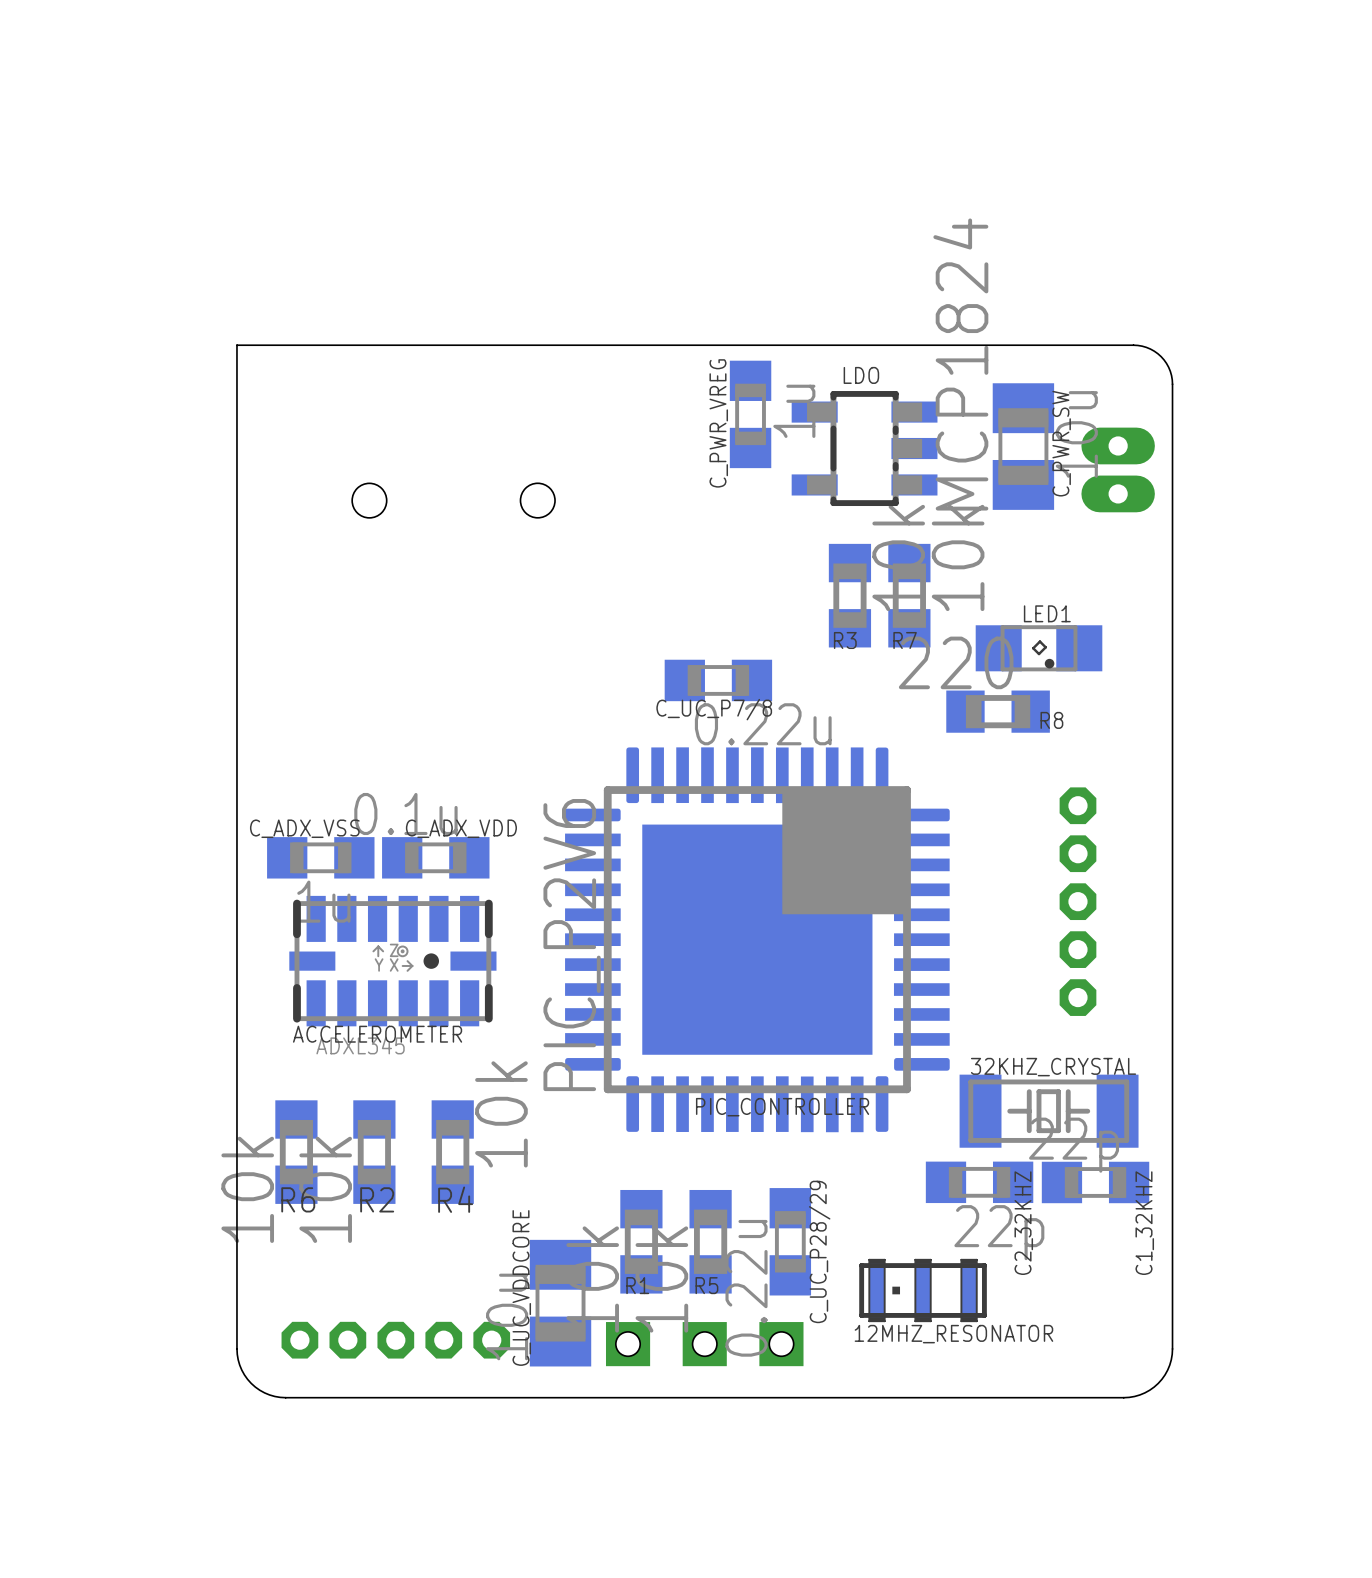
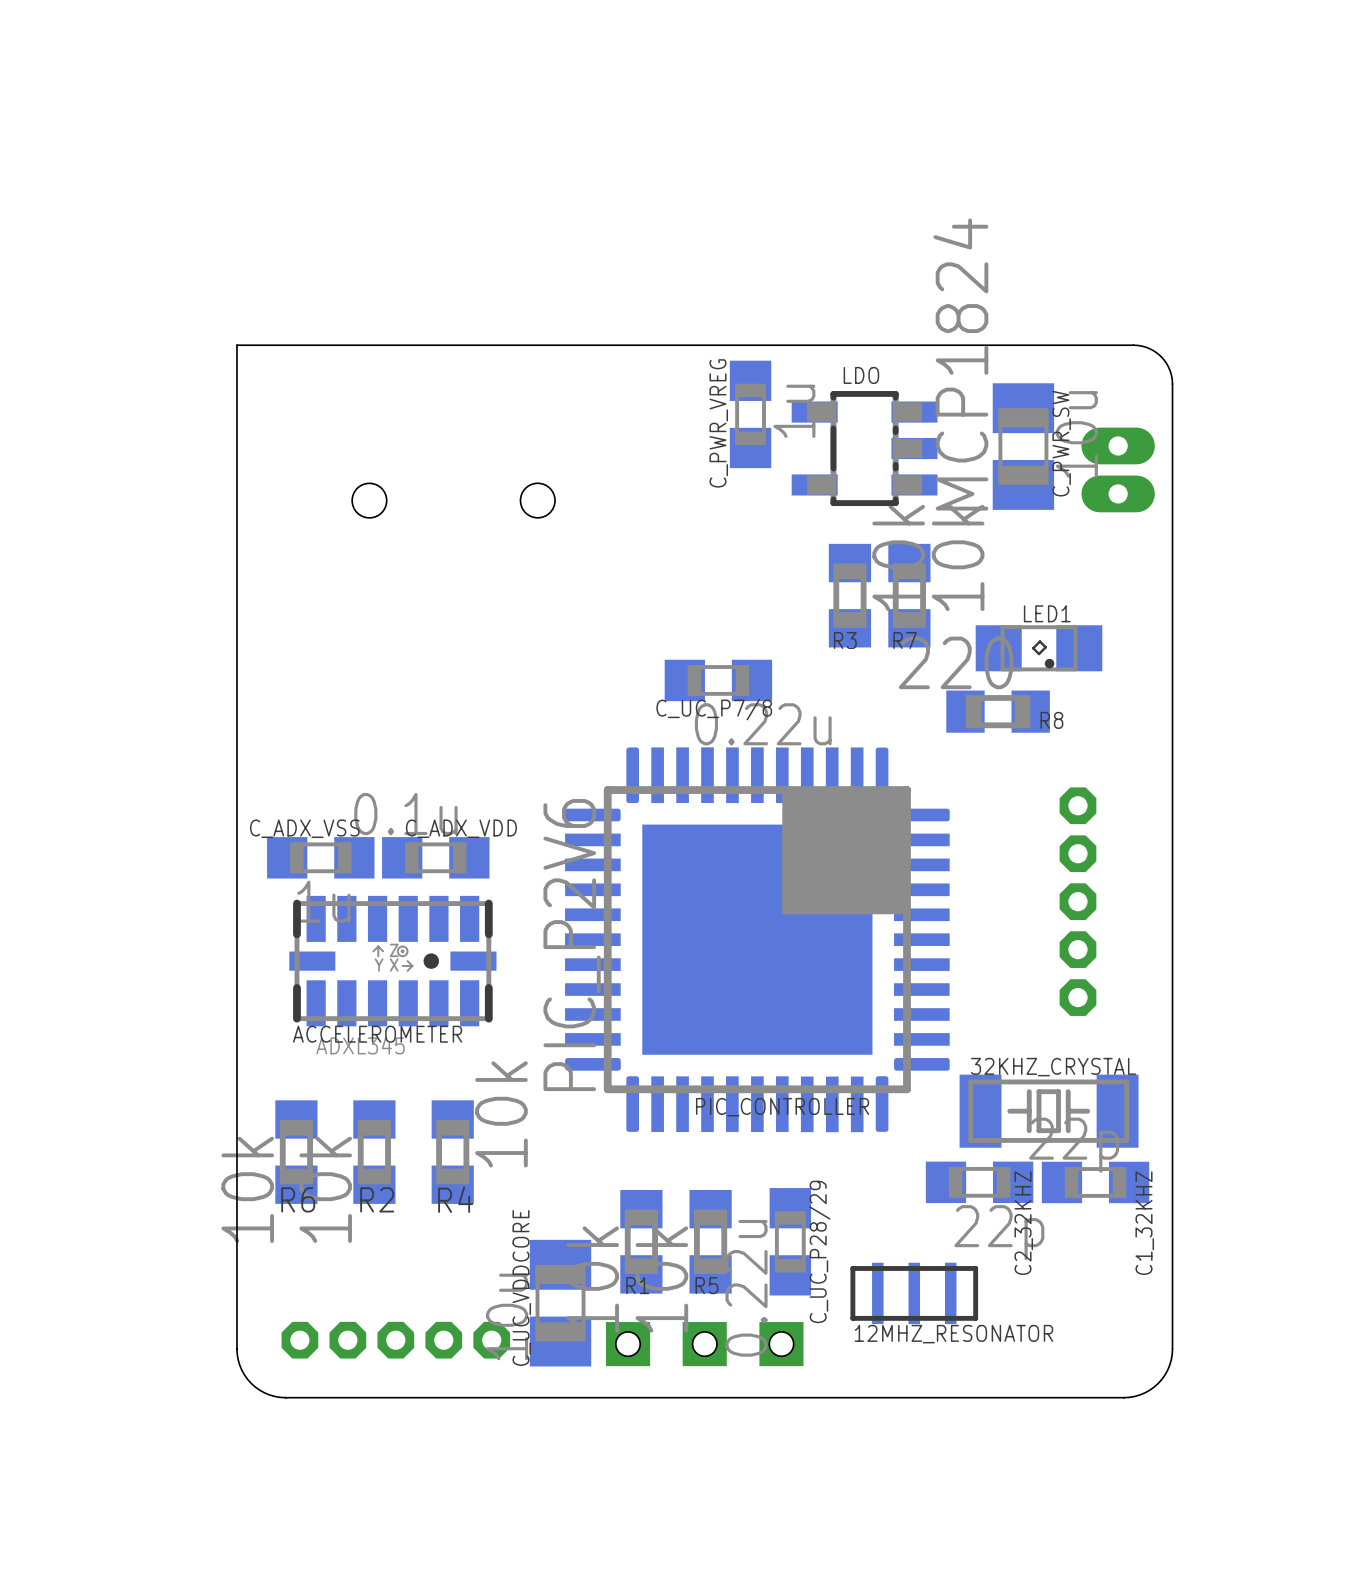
part footprint: [859, 1258, 987, 1323] -> [850, 1262, 979, 1325]

